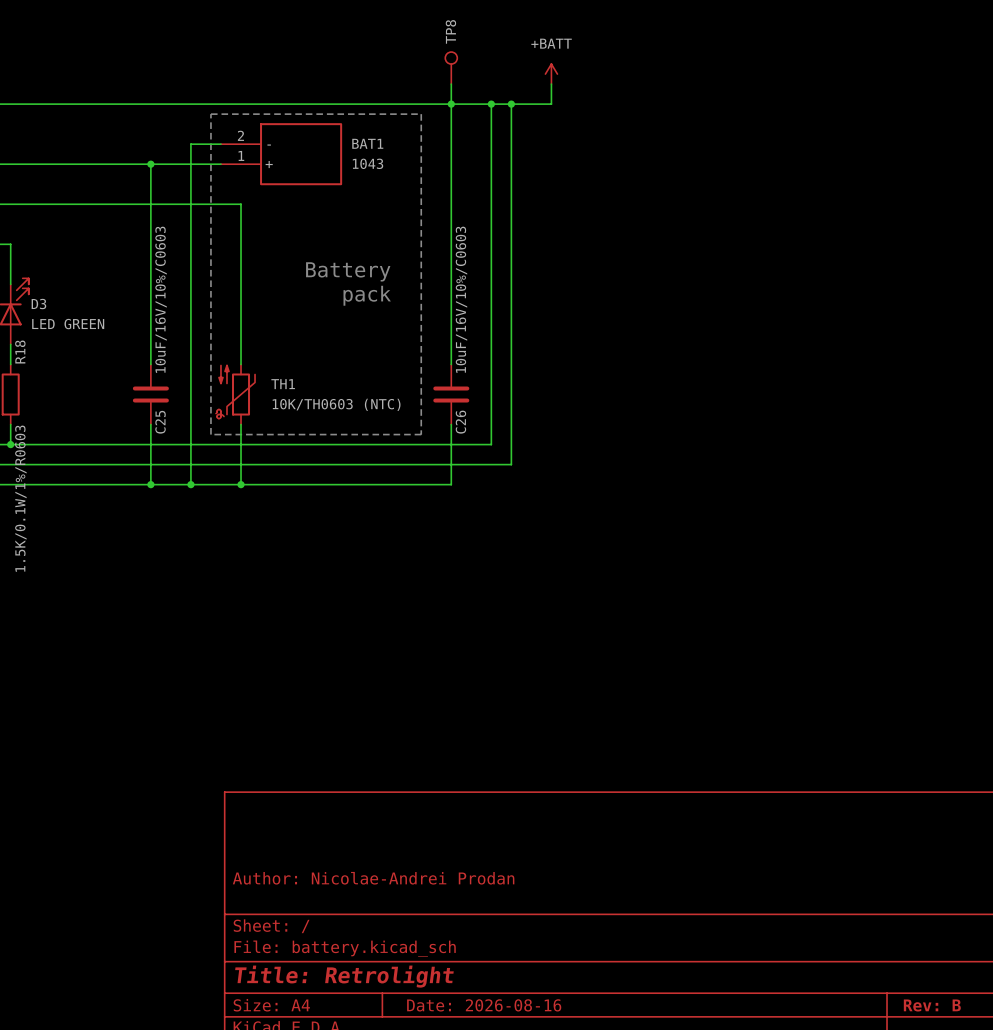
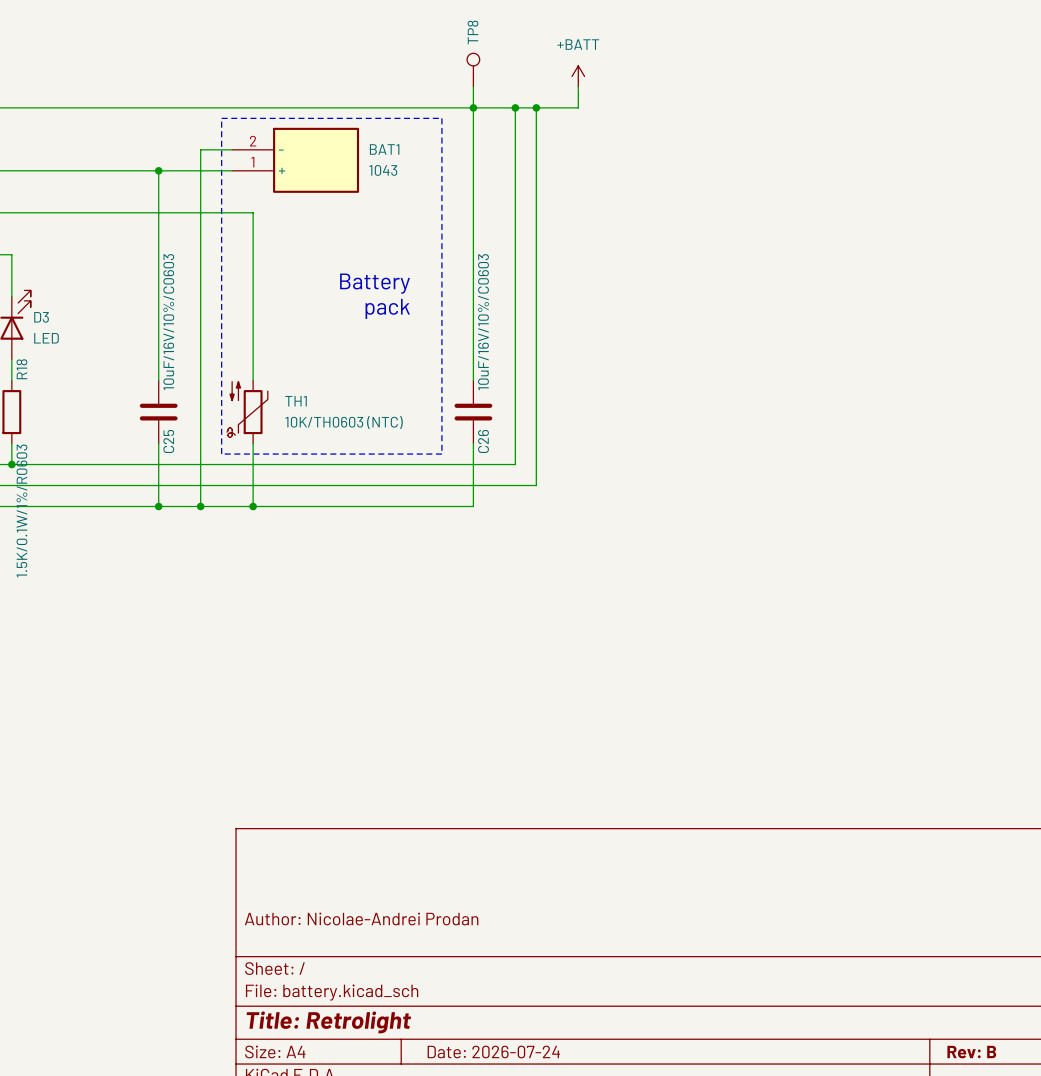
D3 value: LED GREEN (68, 324) -> LED (46, 338)
title block: Date: 2026-08-16 (484, 1005) -> Date: 2026-07-24 (493, 1052)

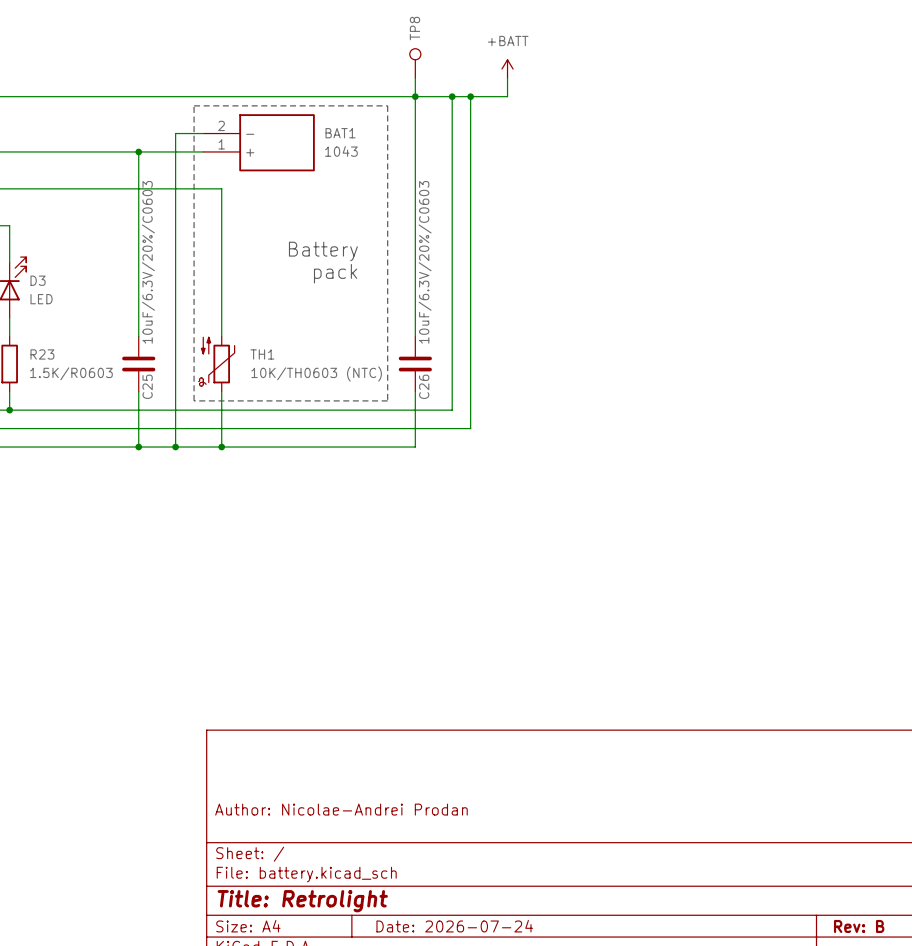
C25 value: 10uF/16V/10%/C0603 (168, 322) -> 10uF/6.3V/20%/C0603 (148, 262)
C26 value: 10uF/16V/10%/C0603 (483, 322) -> 10uF/6.3V/20%/C0603 (425, 262)
R18 name: R18 (21, 369) -> R23 (42, 354)
R18 value: 1.5K/0.1W/1%/R0603 (21, 511) -> 1.5K/R0603 (71, 373)

